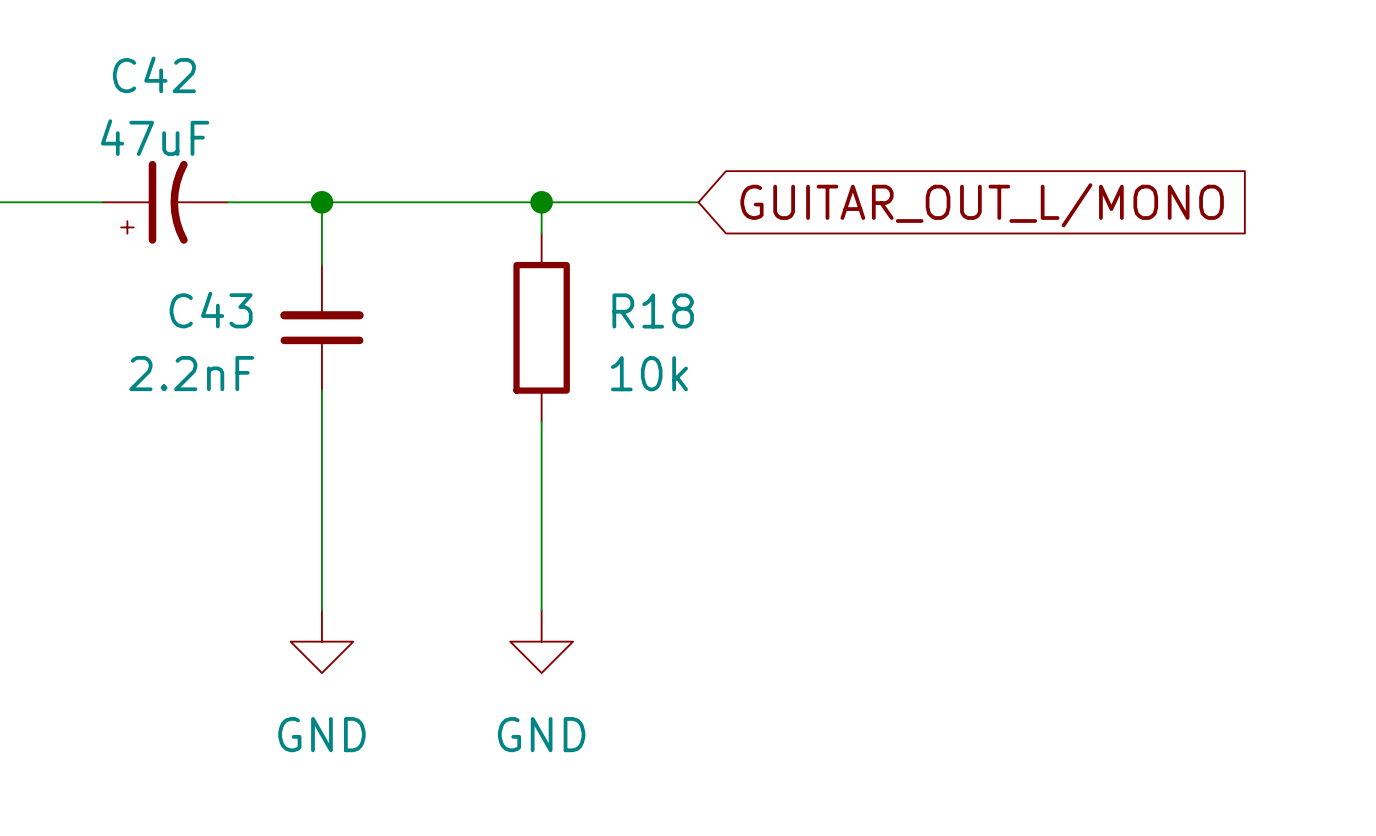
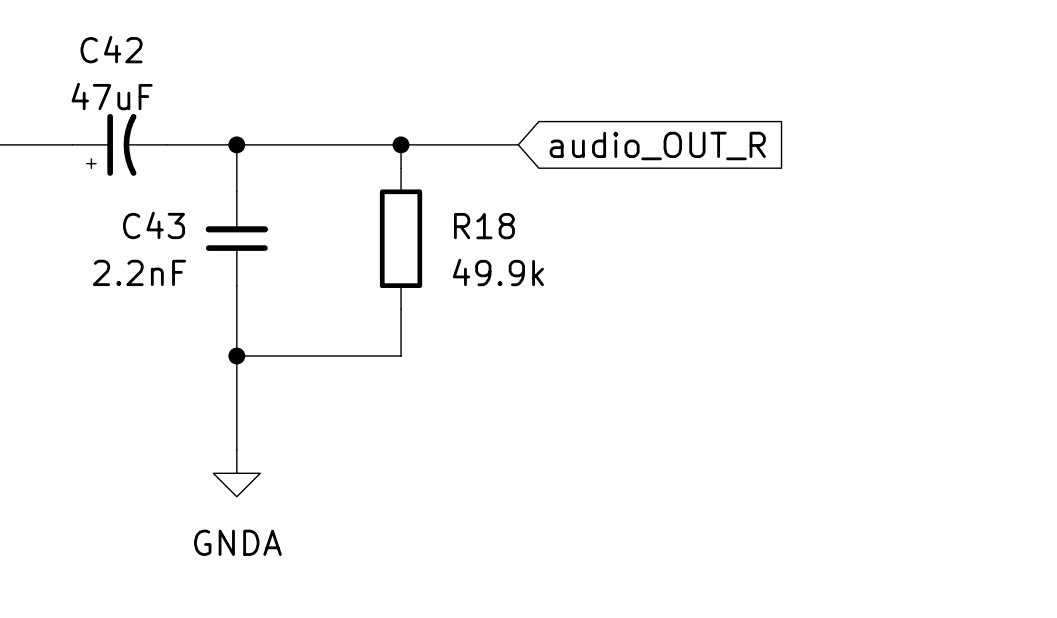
global label: GUITAR_OUT_L/MONO (982, 205) -> audio_OUT_R (657, 146)
R18 value: 10k (649, 373) -> 49.9k (498, 272)
junction: none -> (236, 356)
wire: (541, 484) (541, 610) -> (401, 356) (236, 356)
power symbol: GND (321, 641) -> GNDA (236, 473)
power symbol: GND (541, 641) -> none

